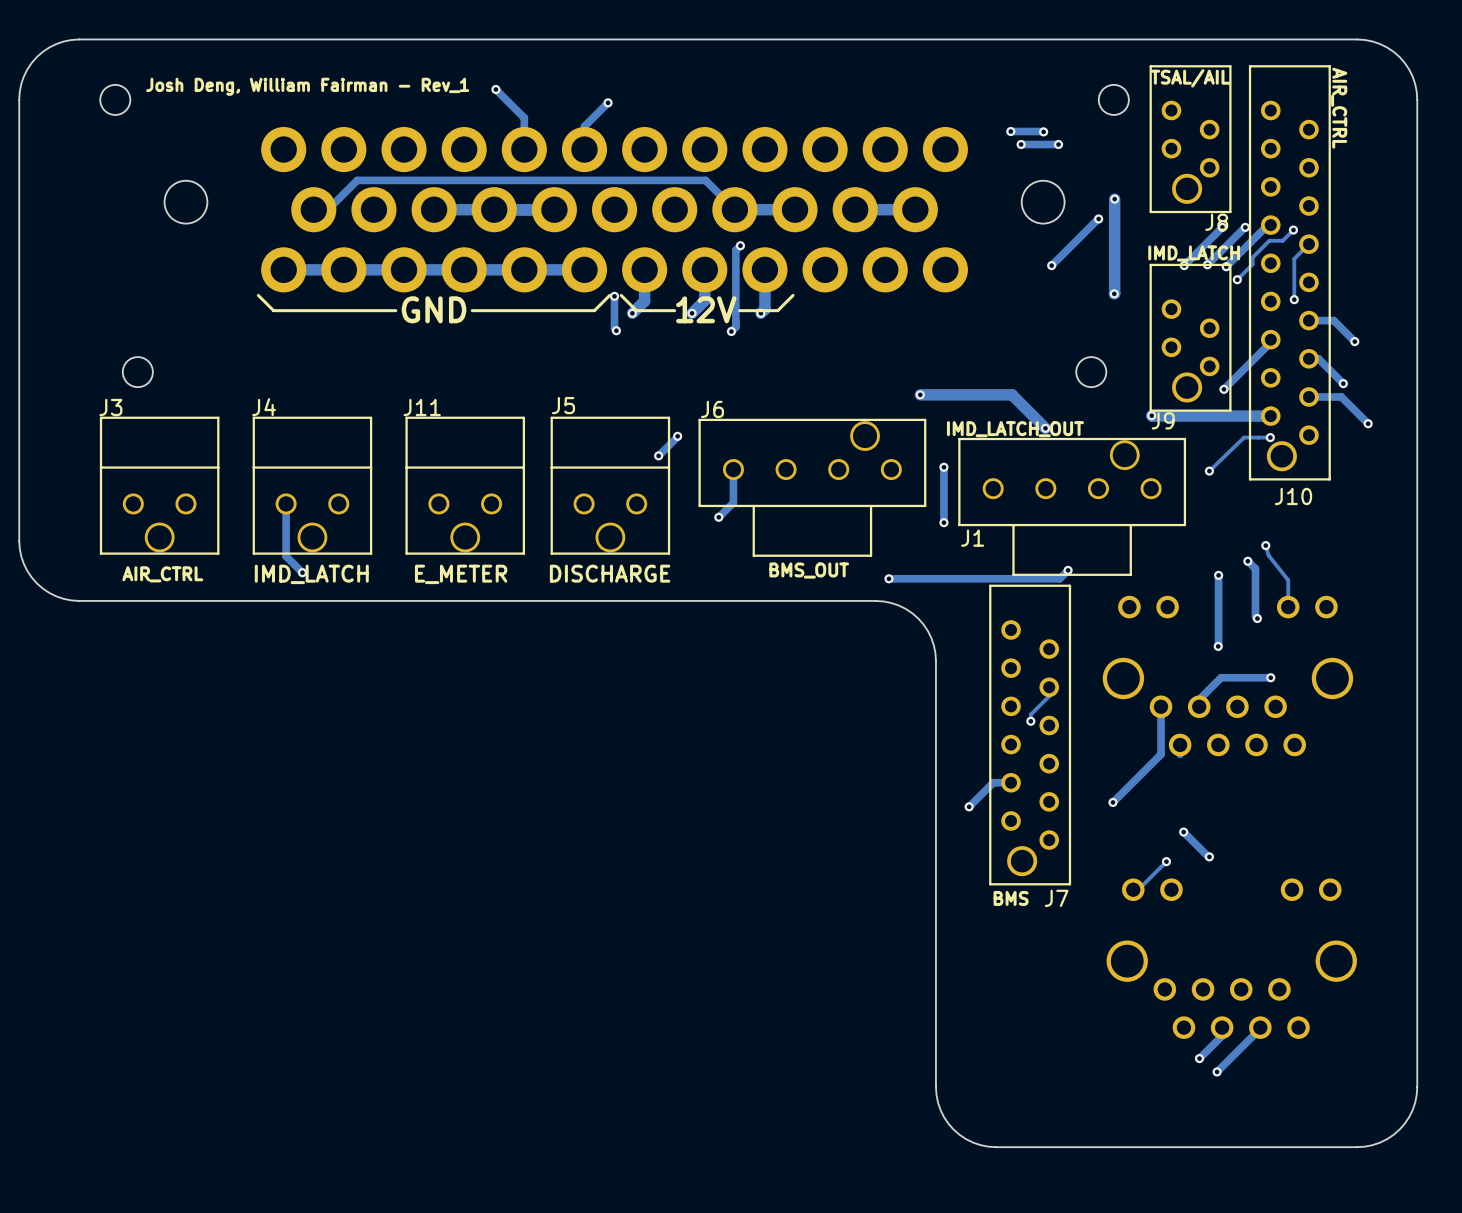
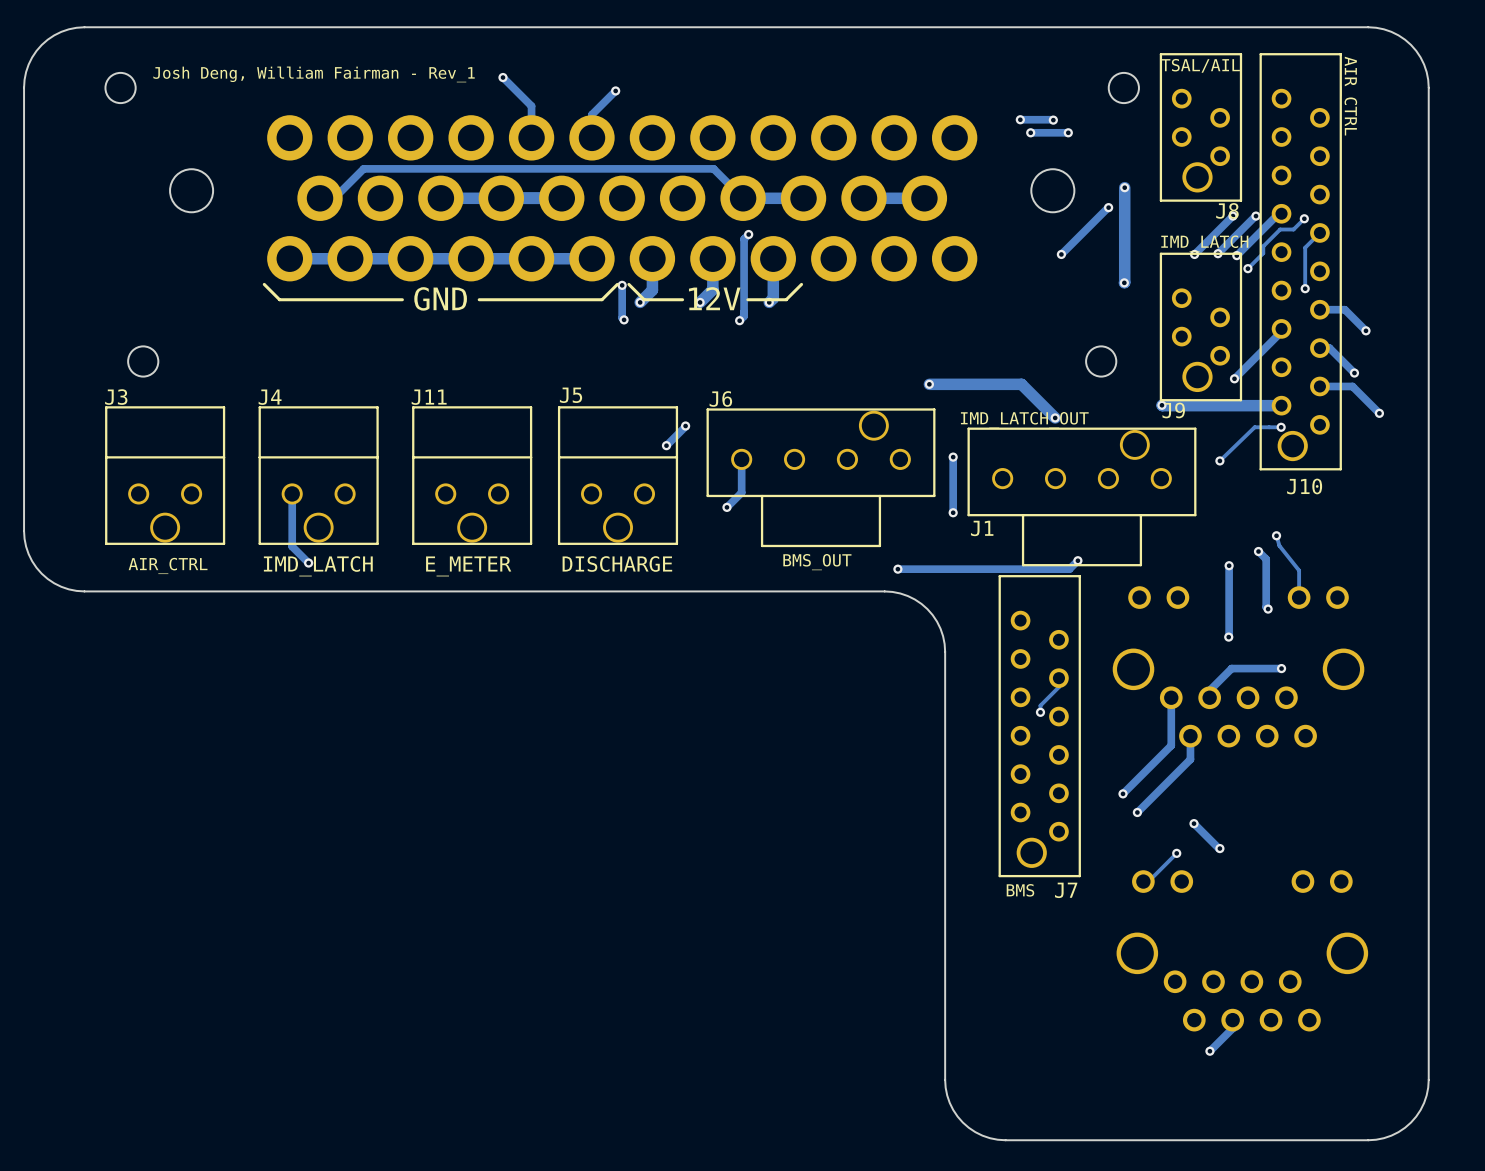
track: none -> (1190, 745) (1190, 759) (1137, 812)
track: (1011, 782) (993, 782) (969, 806) -> none
via: (969, 806) -> none
via: none -> (1137, 812)
track: (1260, 1028) (1217, 1071) -> none
via: (1217, 1071) -> none

